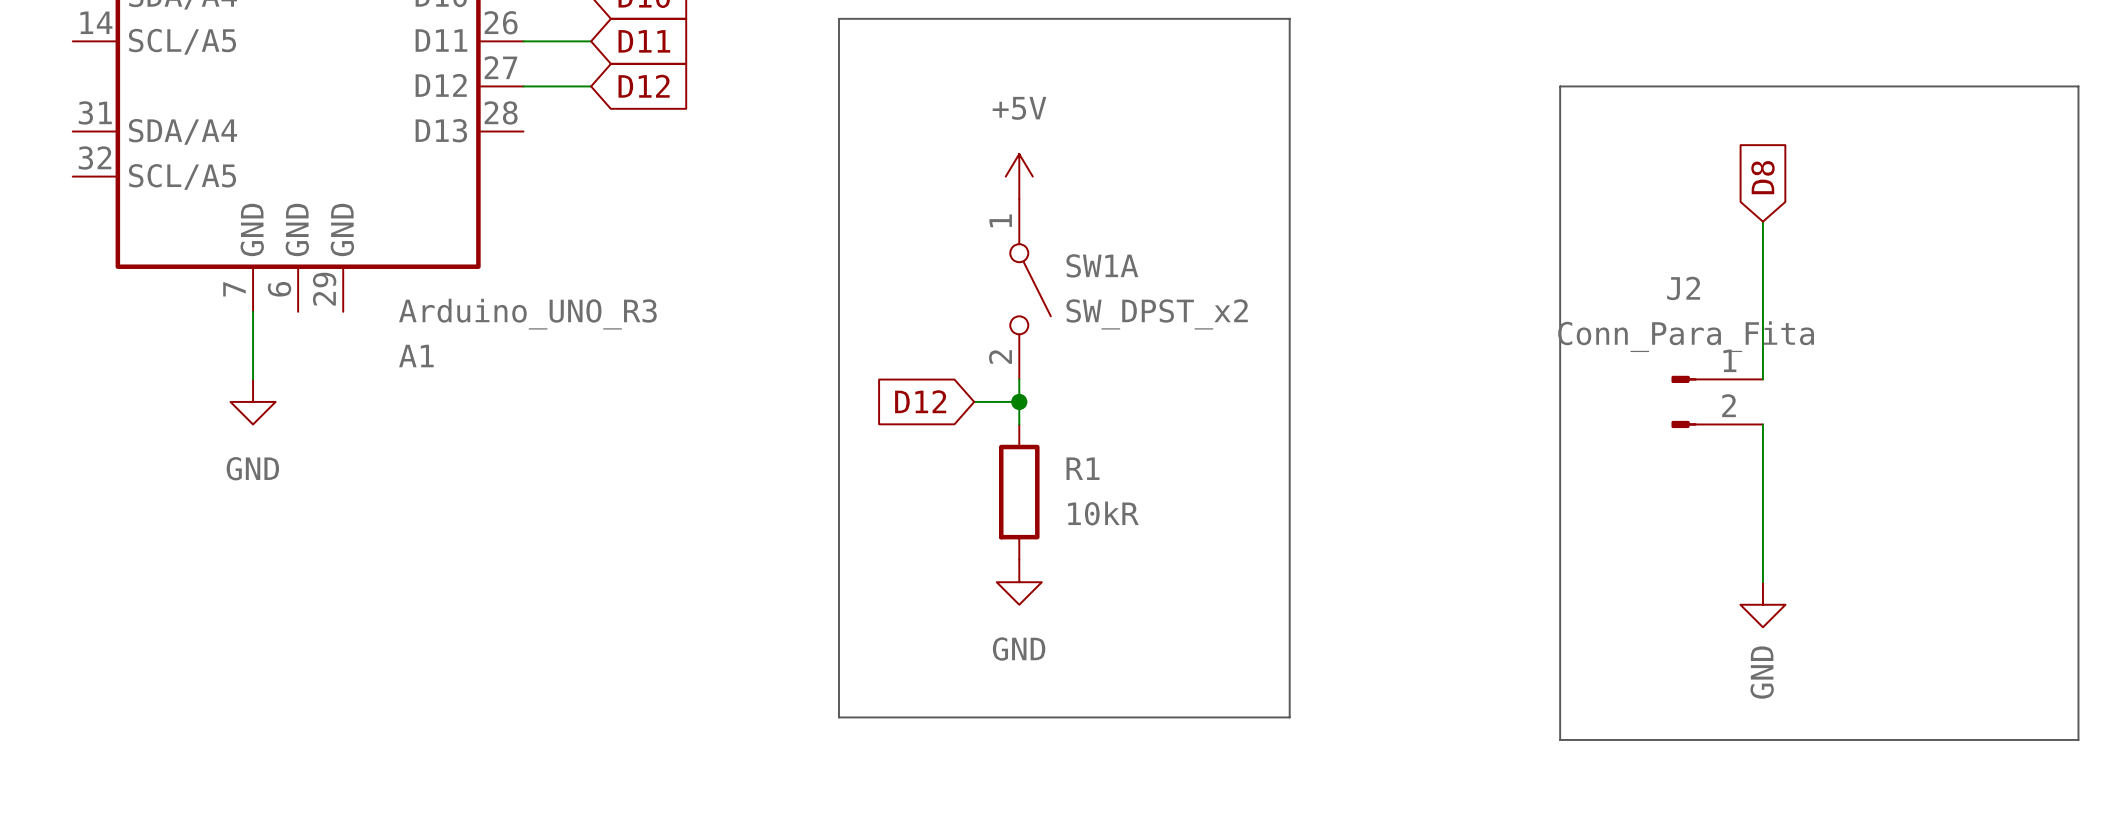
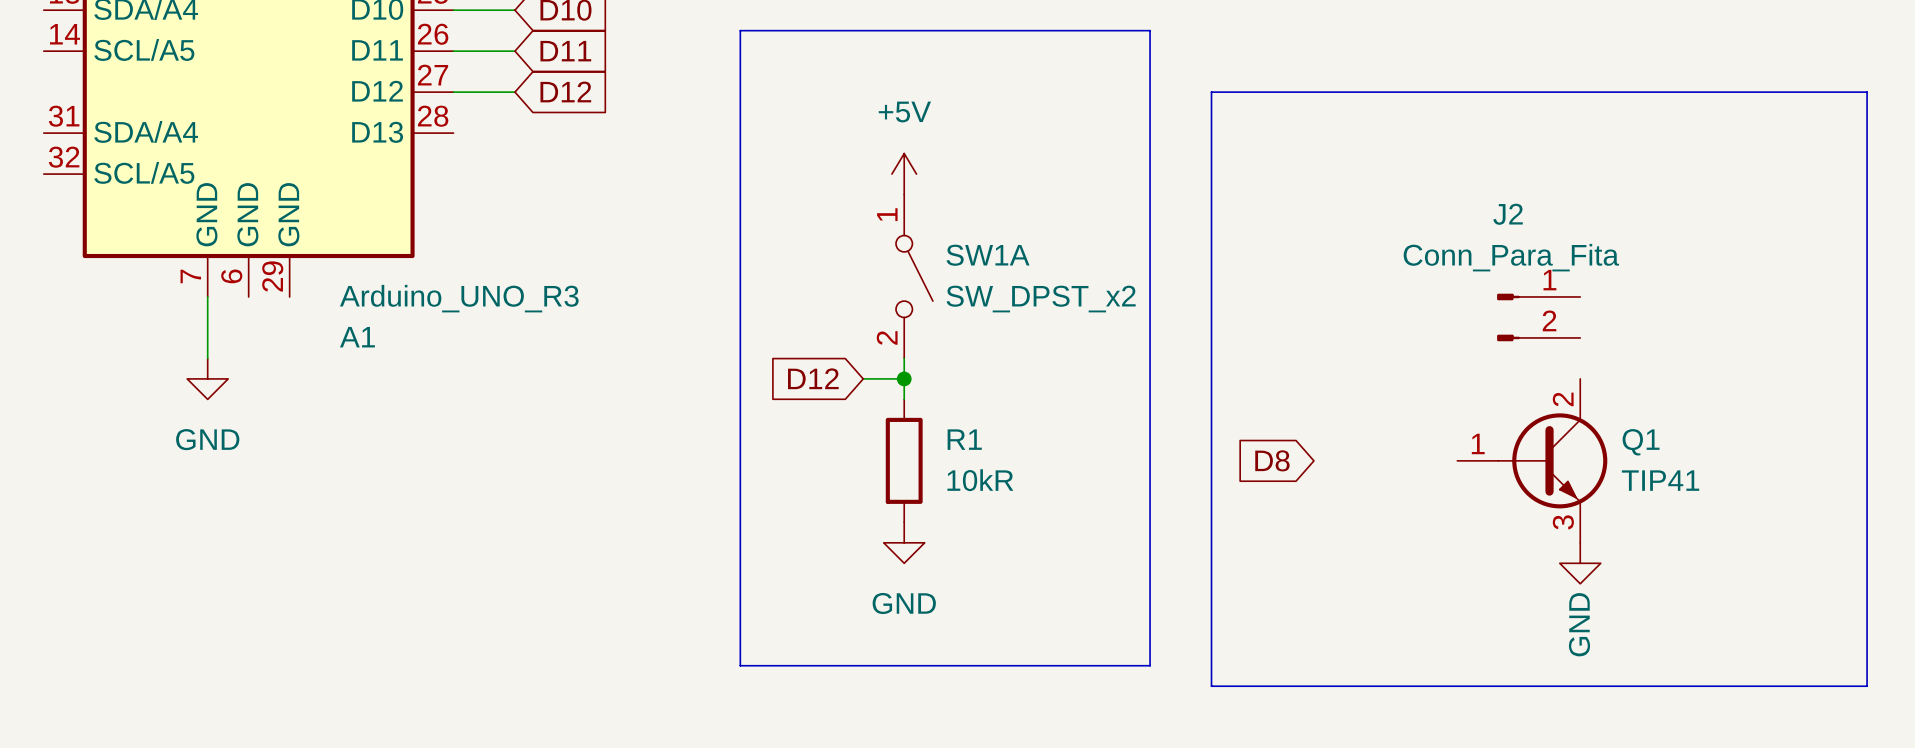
line: (1560, 86) (1560, 739) -> (1395, 92) (1211, 92) (1211, 686) (1395, 686)
global label rotation: 0° (1762, 177) -> 90° counterclockwise (1272, 460)
global label position: D8 (1762, 177) -> D8 (1272, 460)
wire: (1762, 221) (1762, 379) -> none
J2 position: (1717, 401) -> (1538, 317)
wire: (1762, 424) (1762, 582) -> none
Q1: none -> TIP41 (1532, 460)

